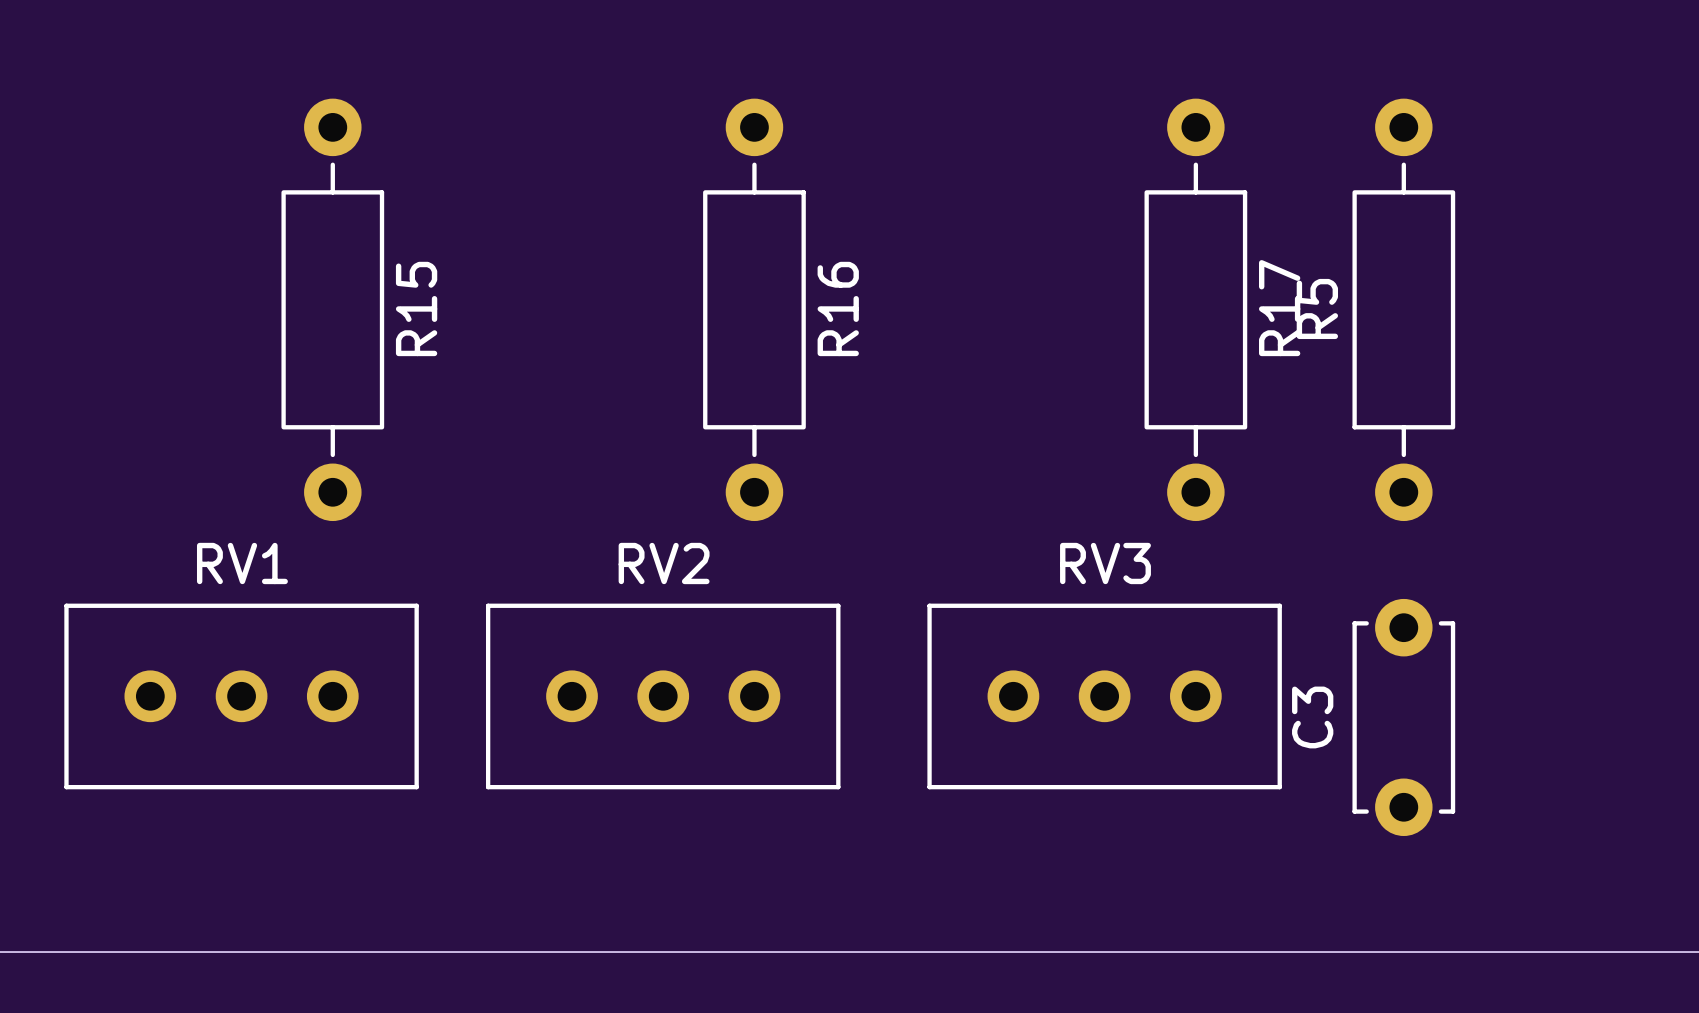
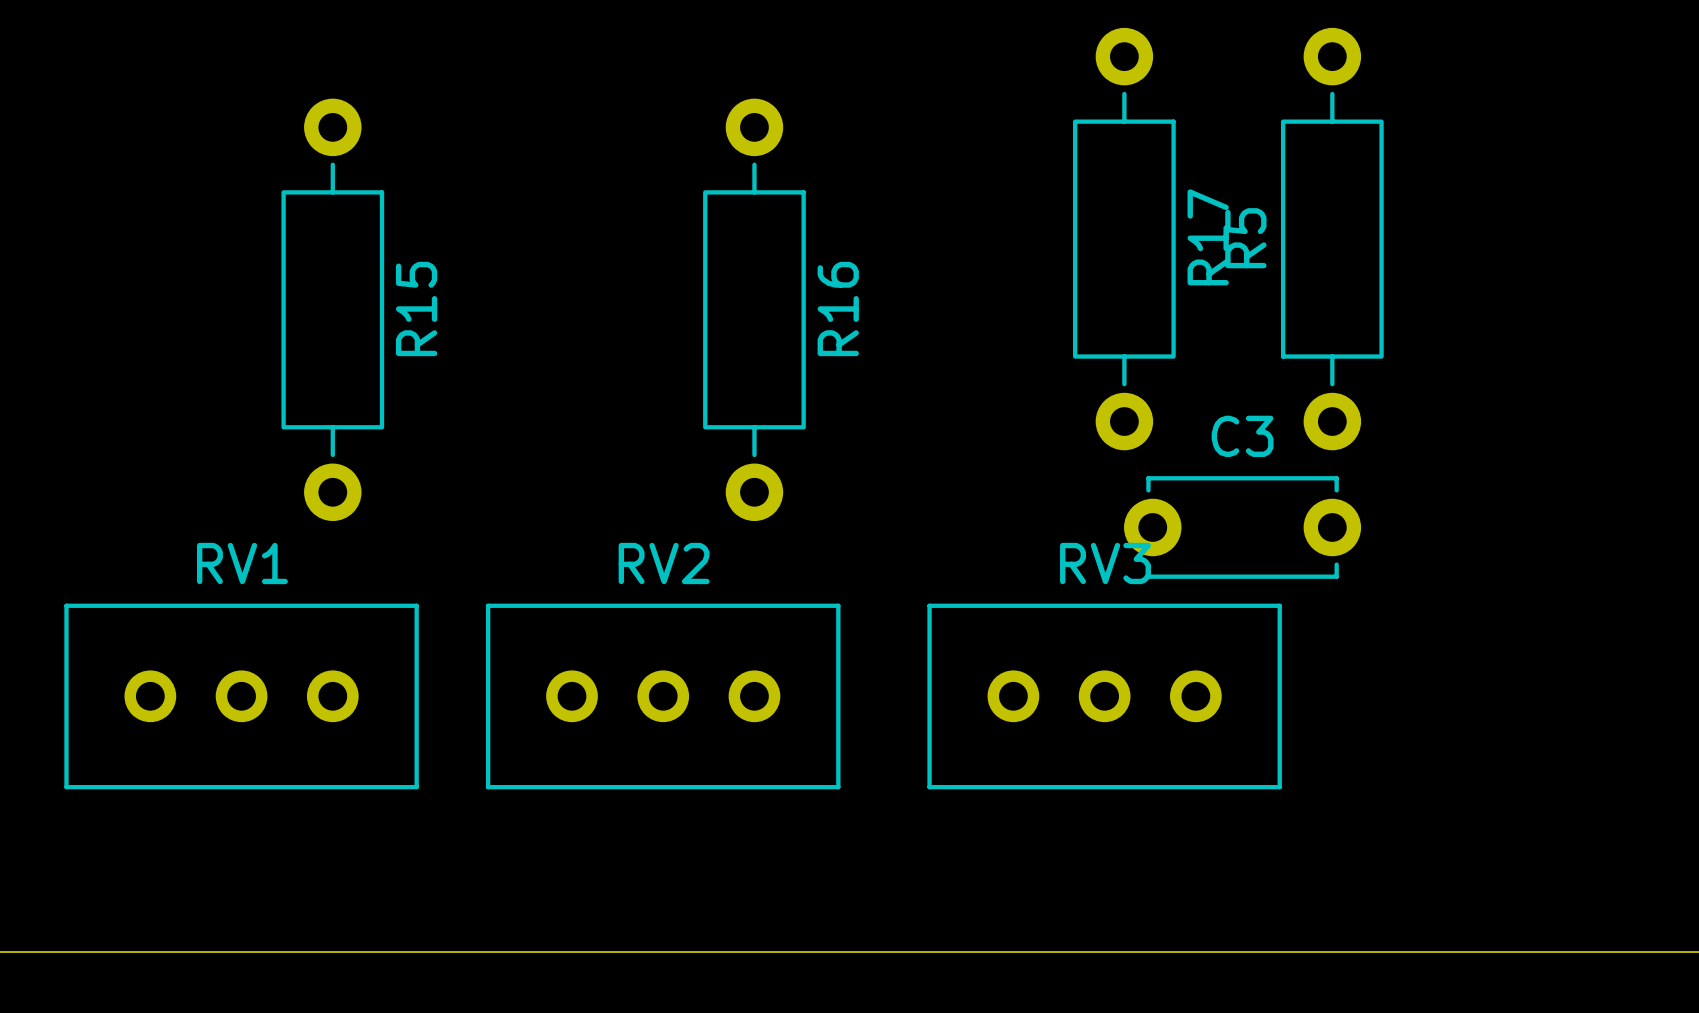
R17 position: (1195, 309) -> (1124, 239)
R5 position: (1403, 309) -> (1332, 239)
C3 rotation: 0° (1403, 717) -> 90° clockwise (1242, 527)
C3 position: (1403, 717) -> (1242, 527)

